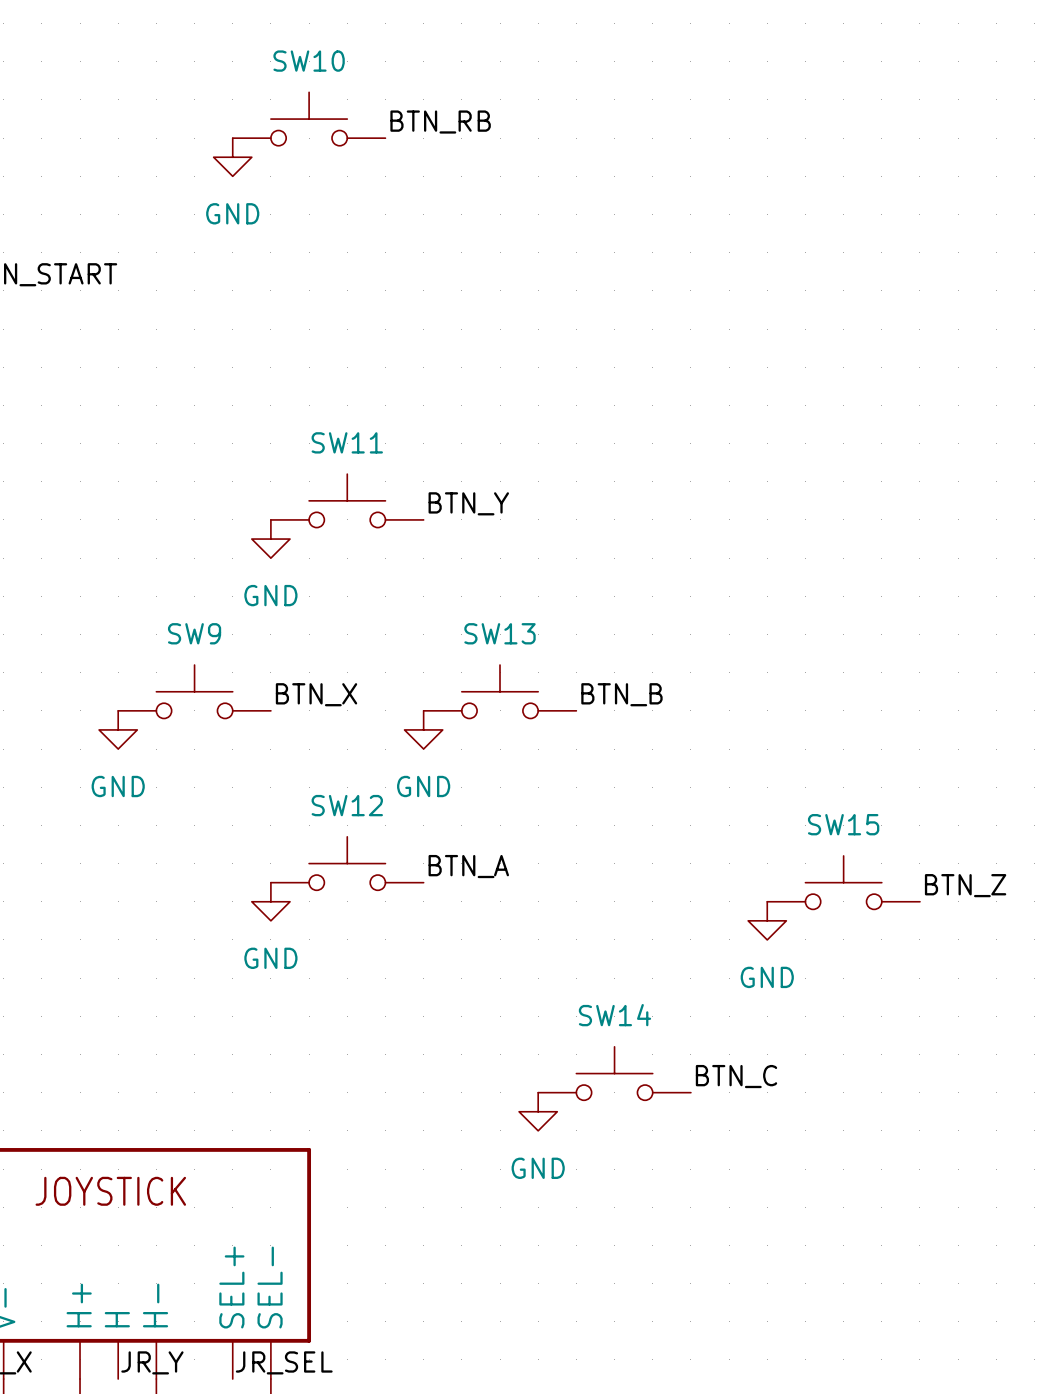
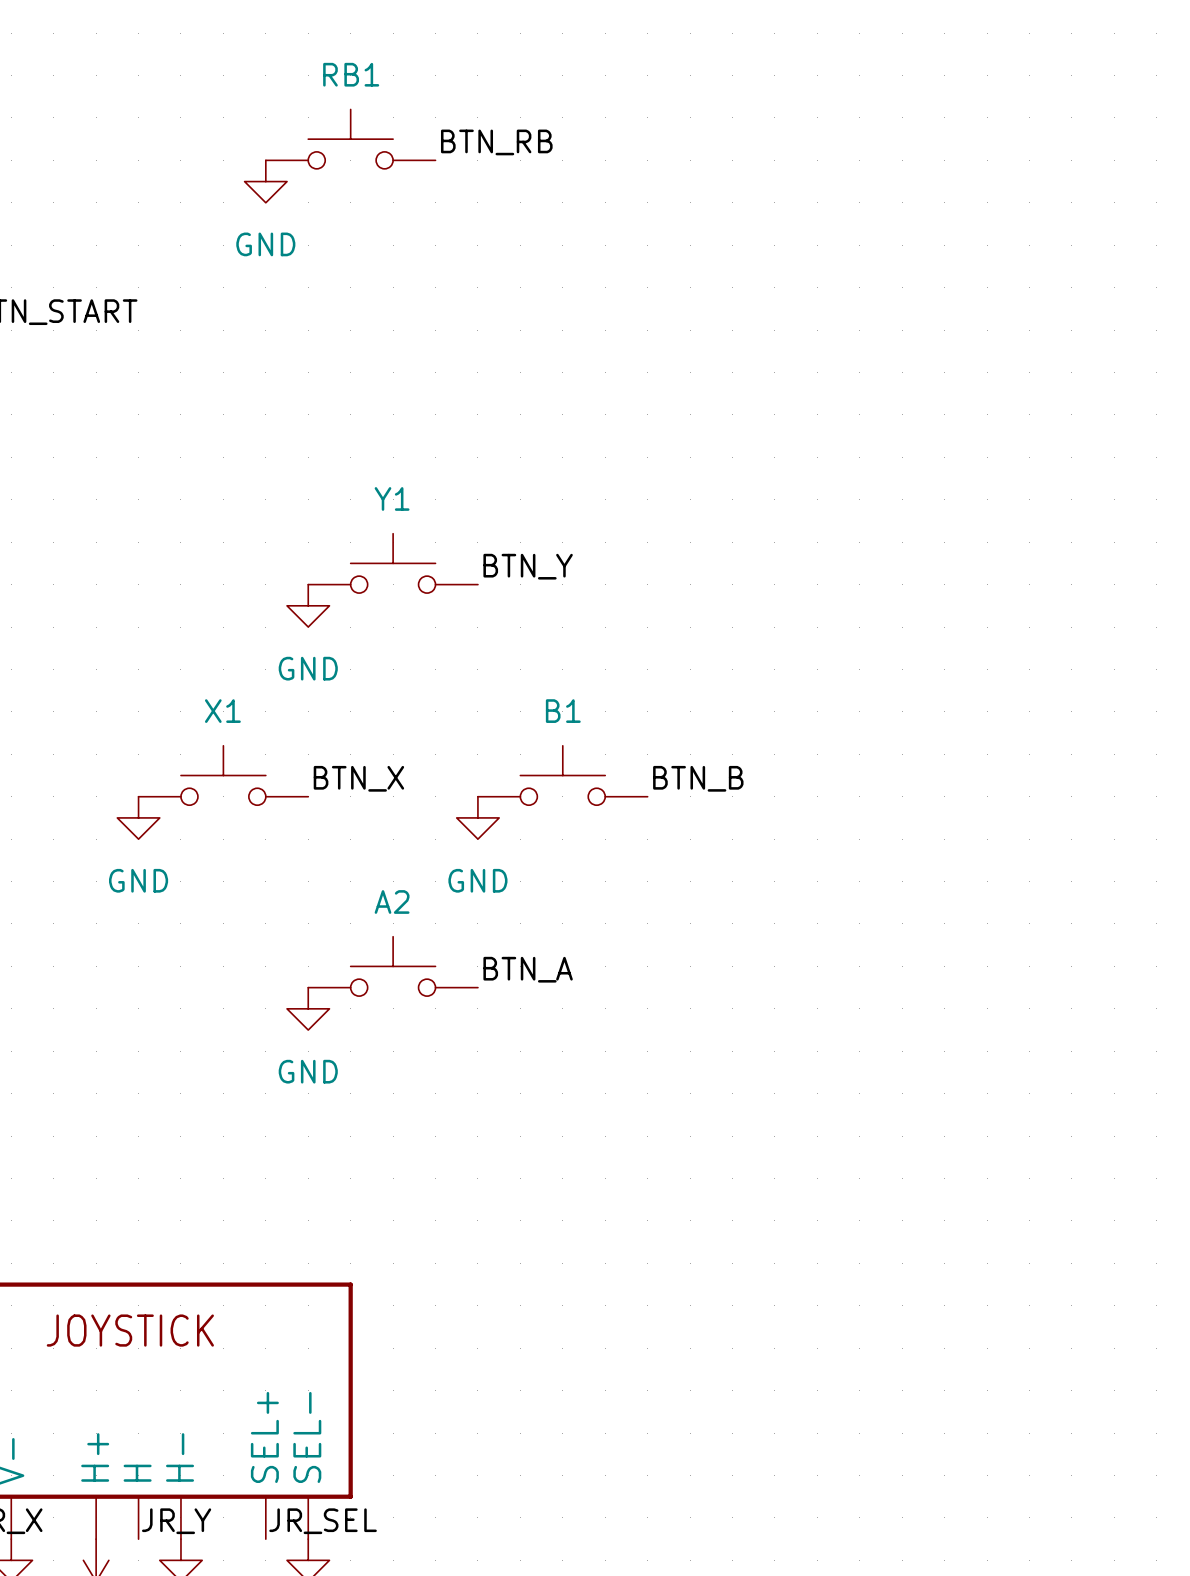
SW10 name: SW10 (309, 61) -> RB1 (351, 74)
SW11 name: SW11 (347, 442) -> Y1 (392, 498)
SW9 name: SW9 (194, 633) -> X1 (222, 711)
SW13 name: SW13 (500, 633) -> B1 (563, 711)
SW12 name: SW12 (347, 805) -> A2 (392, 901)
SW15: (843, 882) -> none
label: BTN_Z (965, 885) -> none
power symbol: GND (767, 920) -> none
SW14: (614, 1073) -> none
label: BTN_C (736, 1076) -> none
power symbol: GND (538, 1111) -> none

